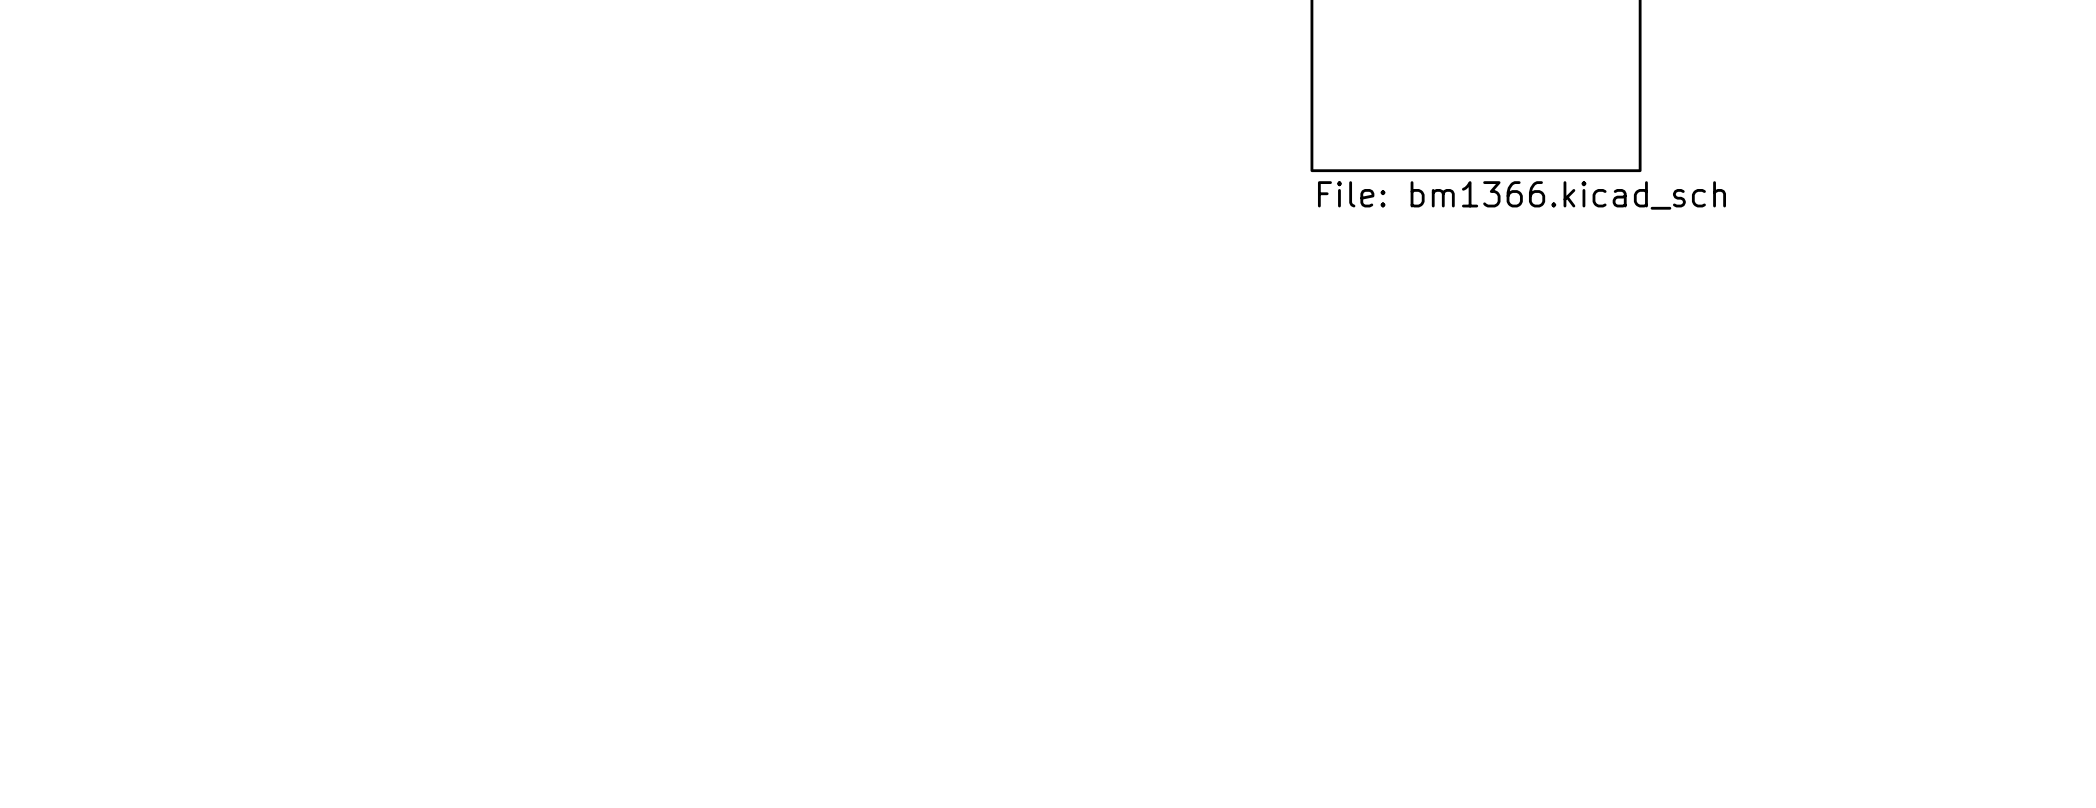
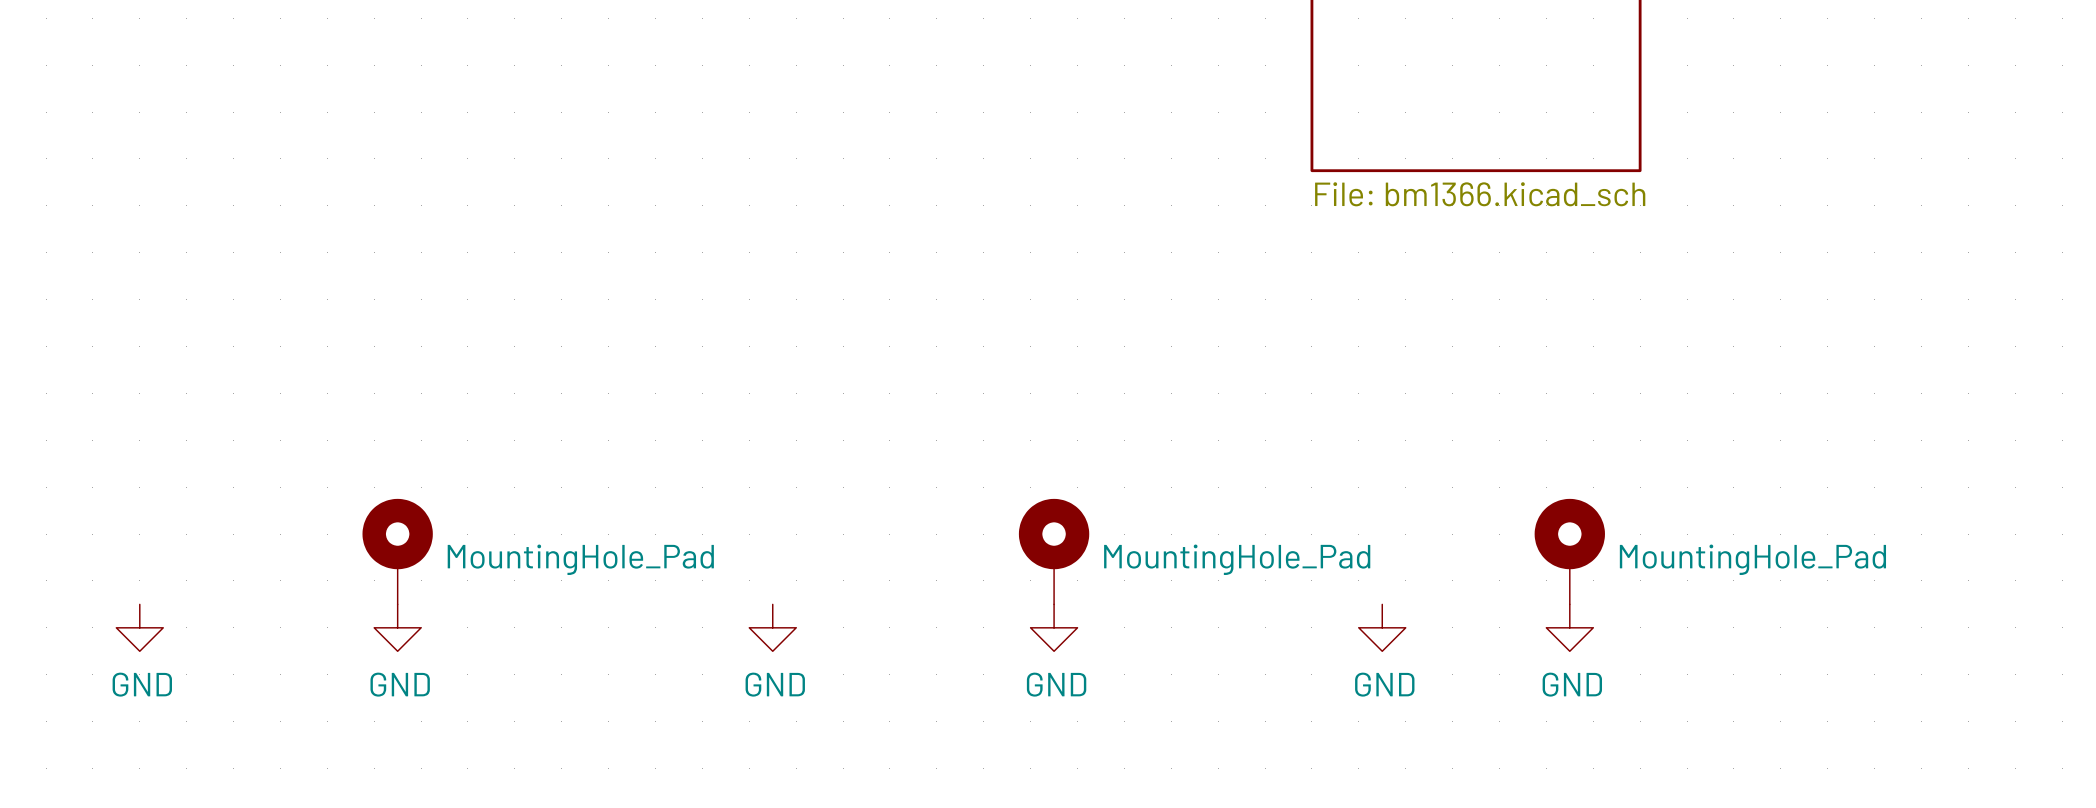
part: none -> MountingHole_Pad (397, 551)
part: none -> MountingHole_Pad (1054, 551)
part: none -> MountingHole_Pad (1569, 551)
power symbol: none -> GND (139, 627)
power symbol: none -> GND (397, 627)
power symbol: none -> GND (772, 627)
power symbol: none -> GND (1054, 627)
power symbol: none -> GND (1382, 627)
power symbol: none -> GND (1569, 627)

